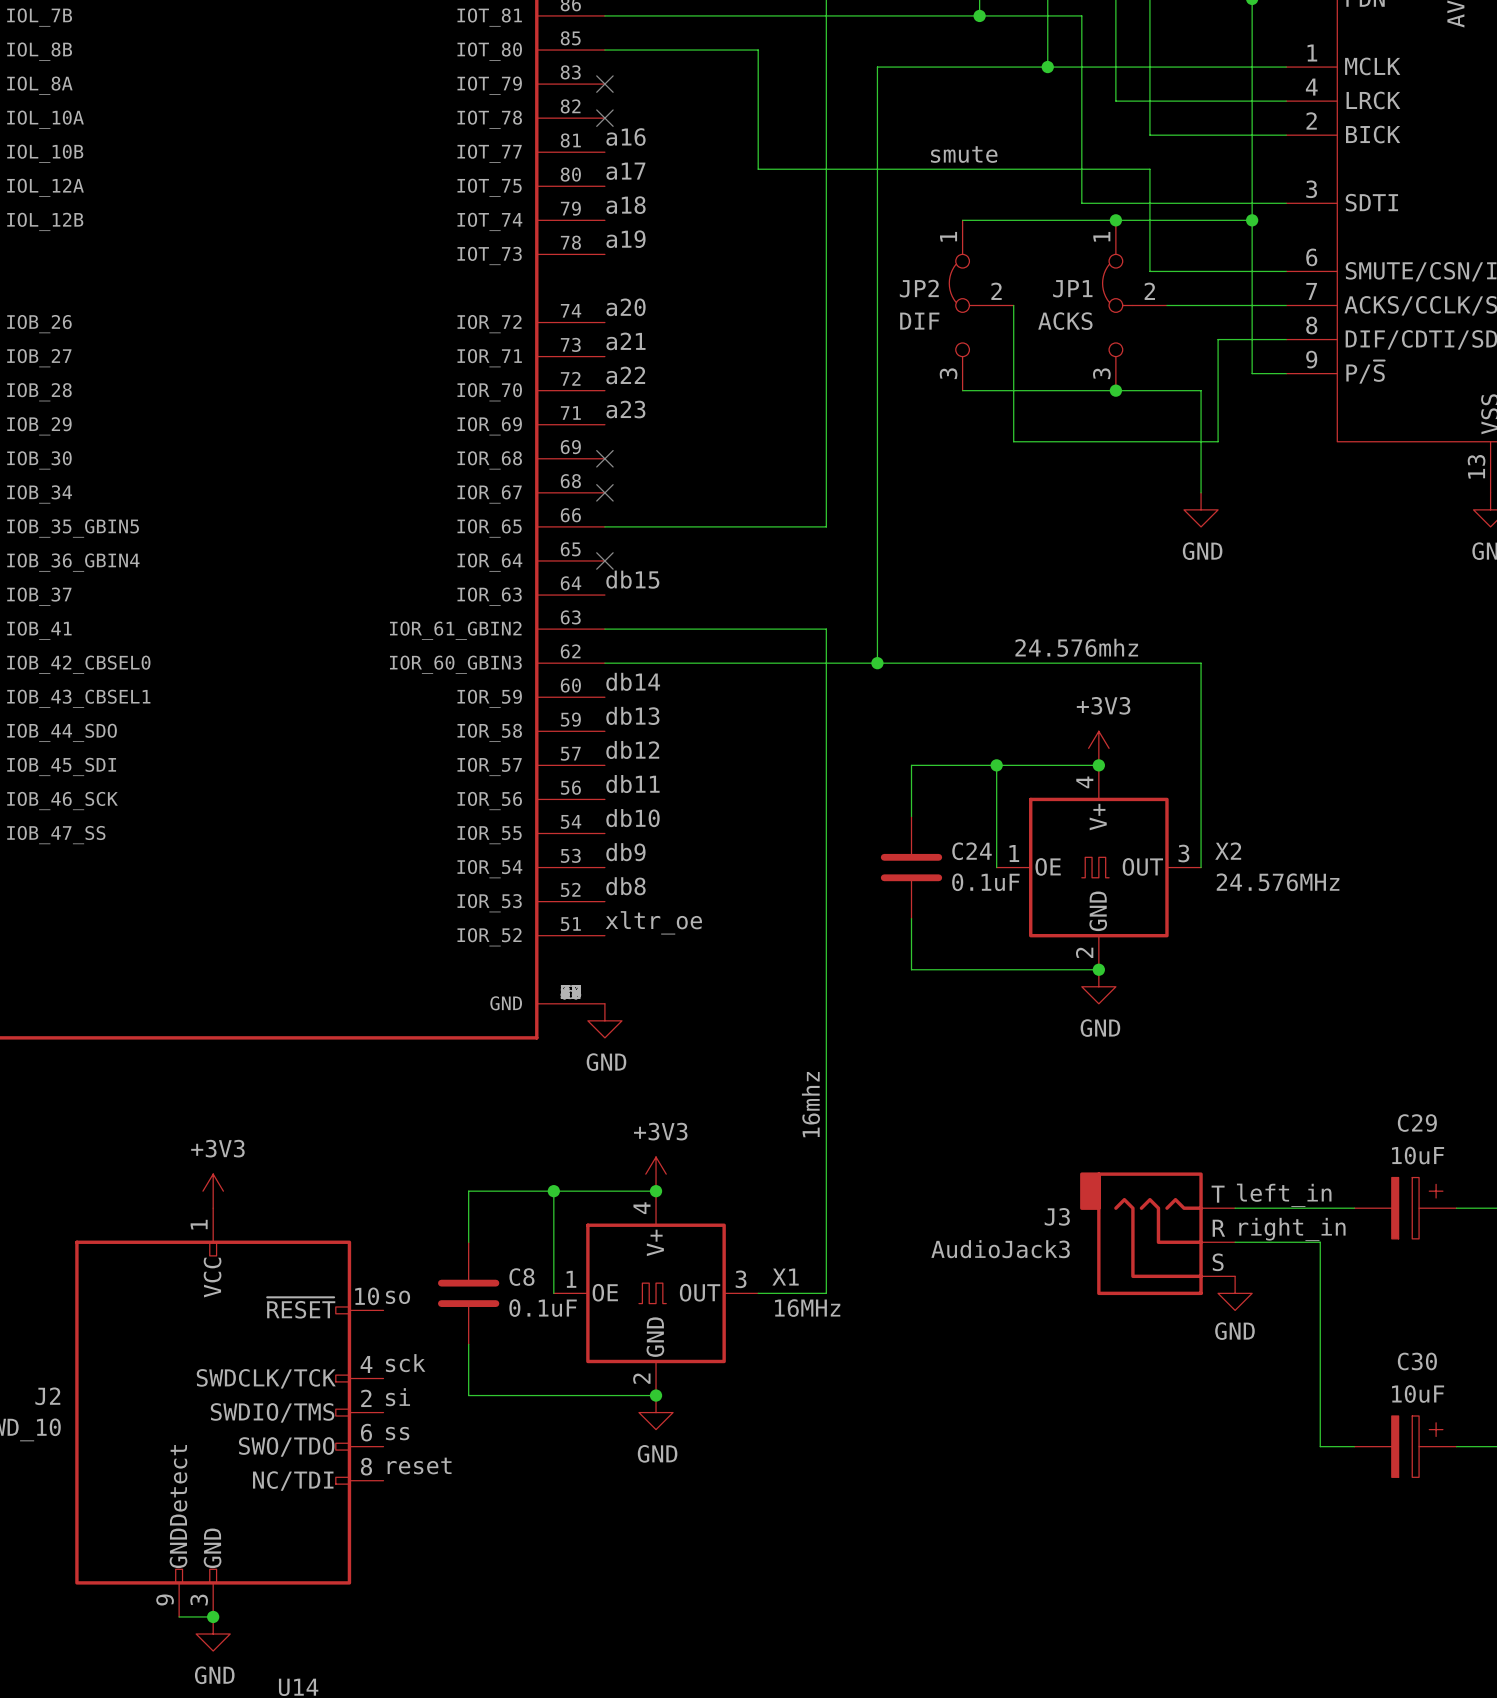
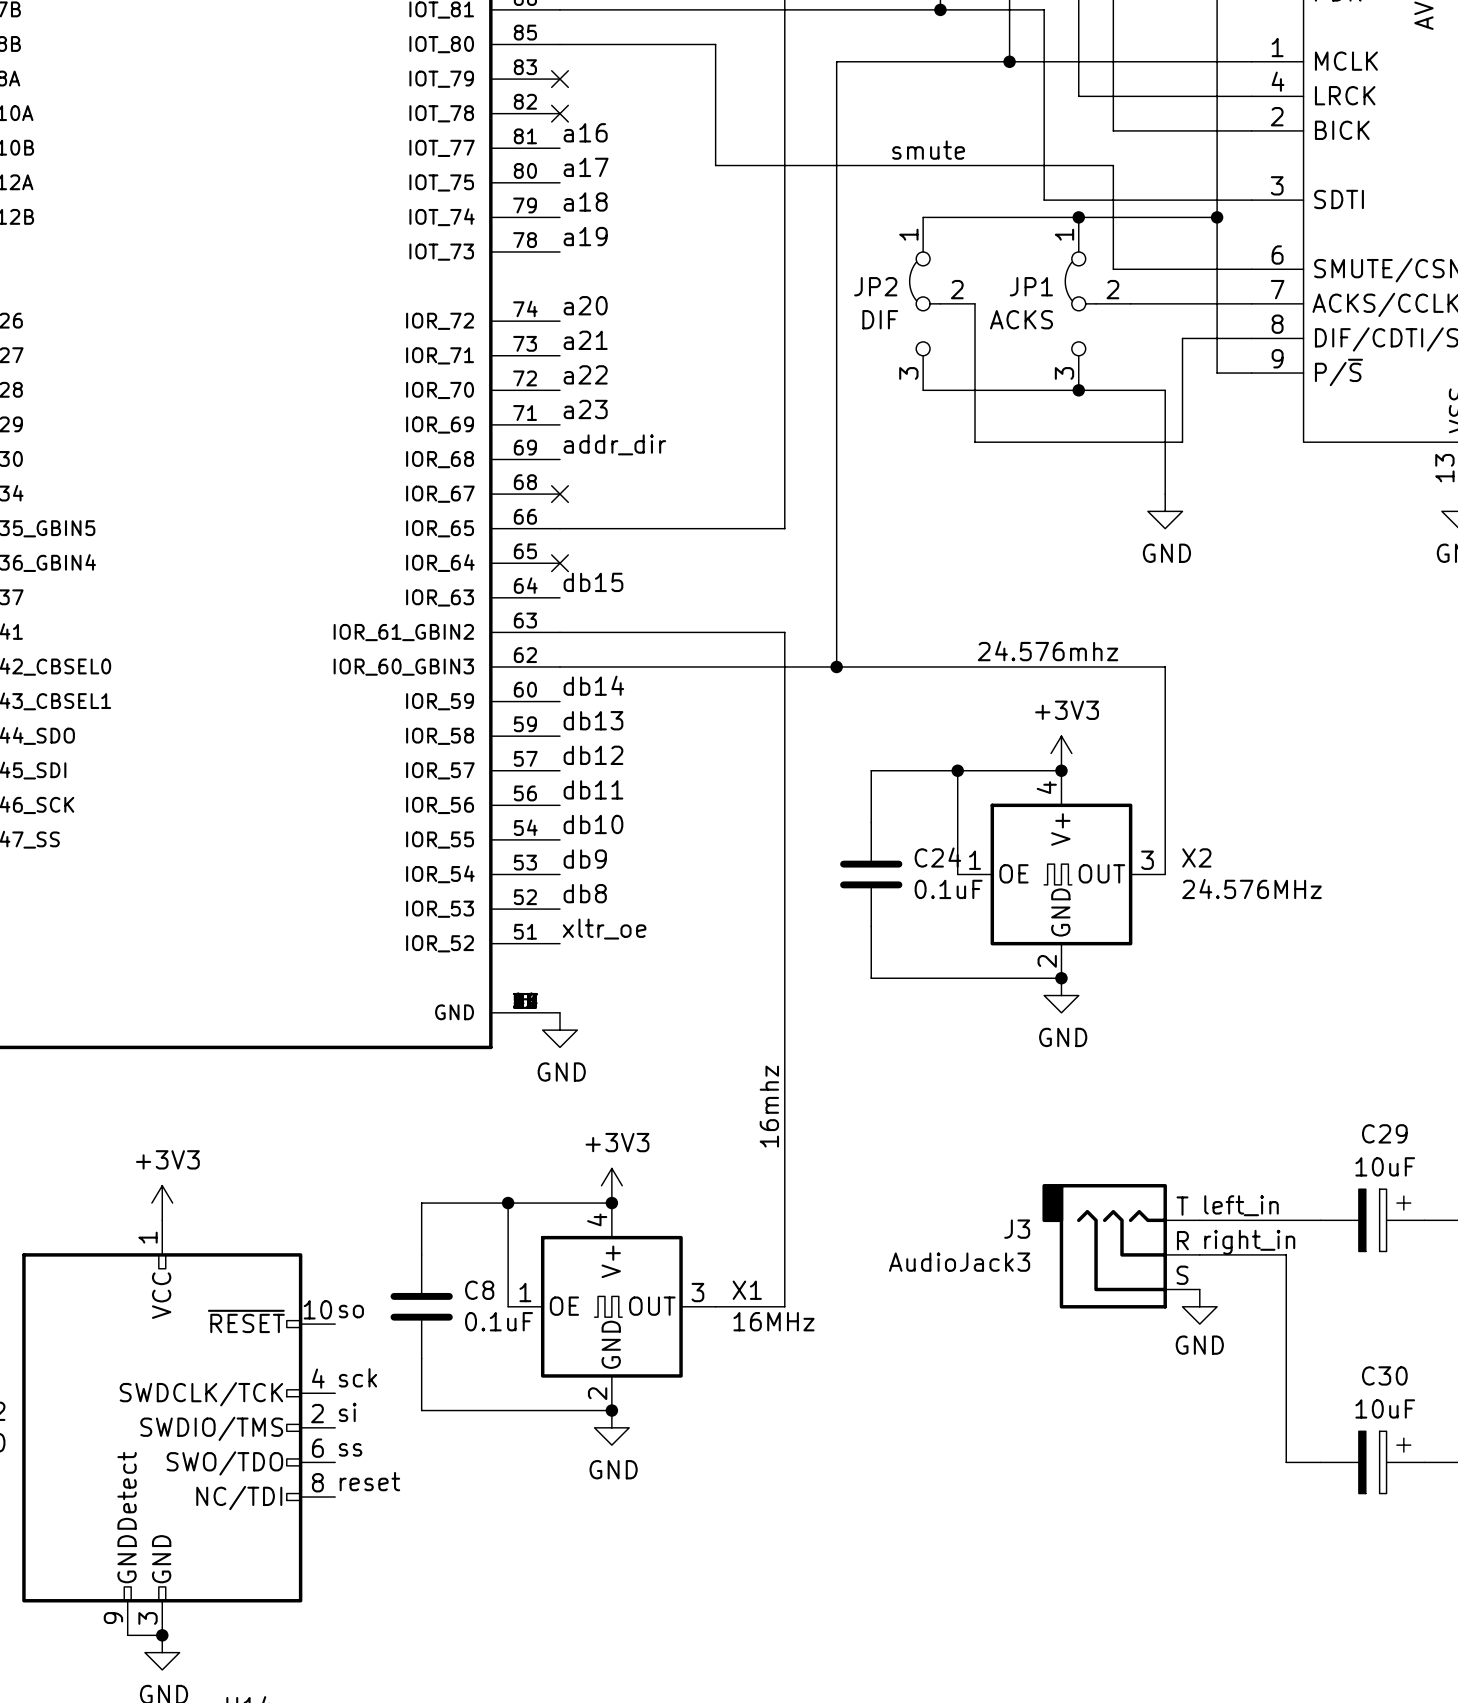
label: none -> addr_dir (614, 444)
no-connect mark: (604, 458) -> none

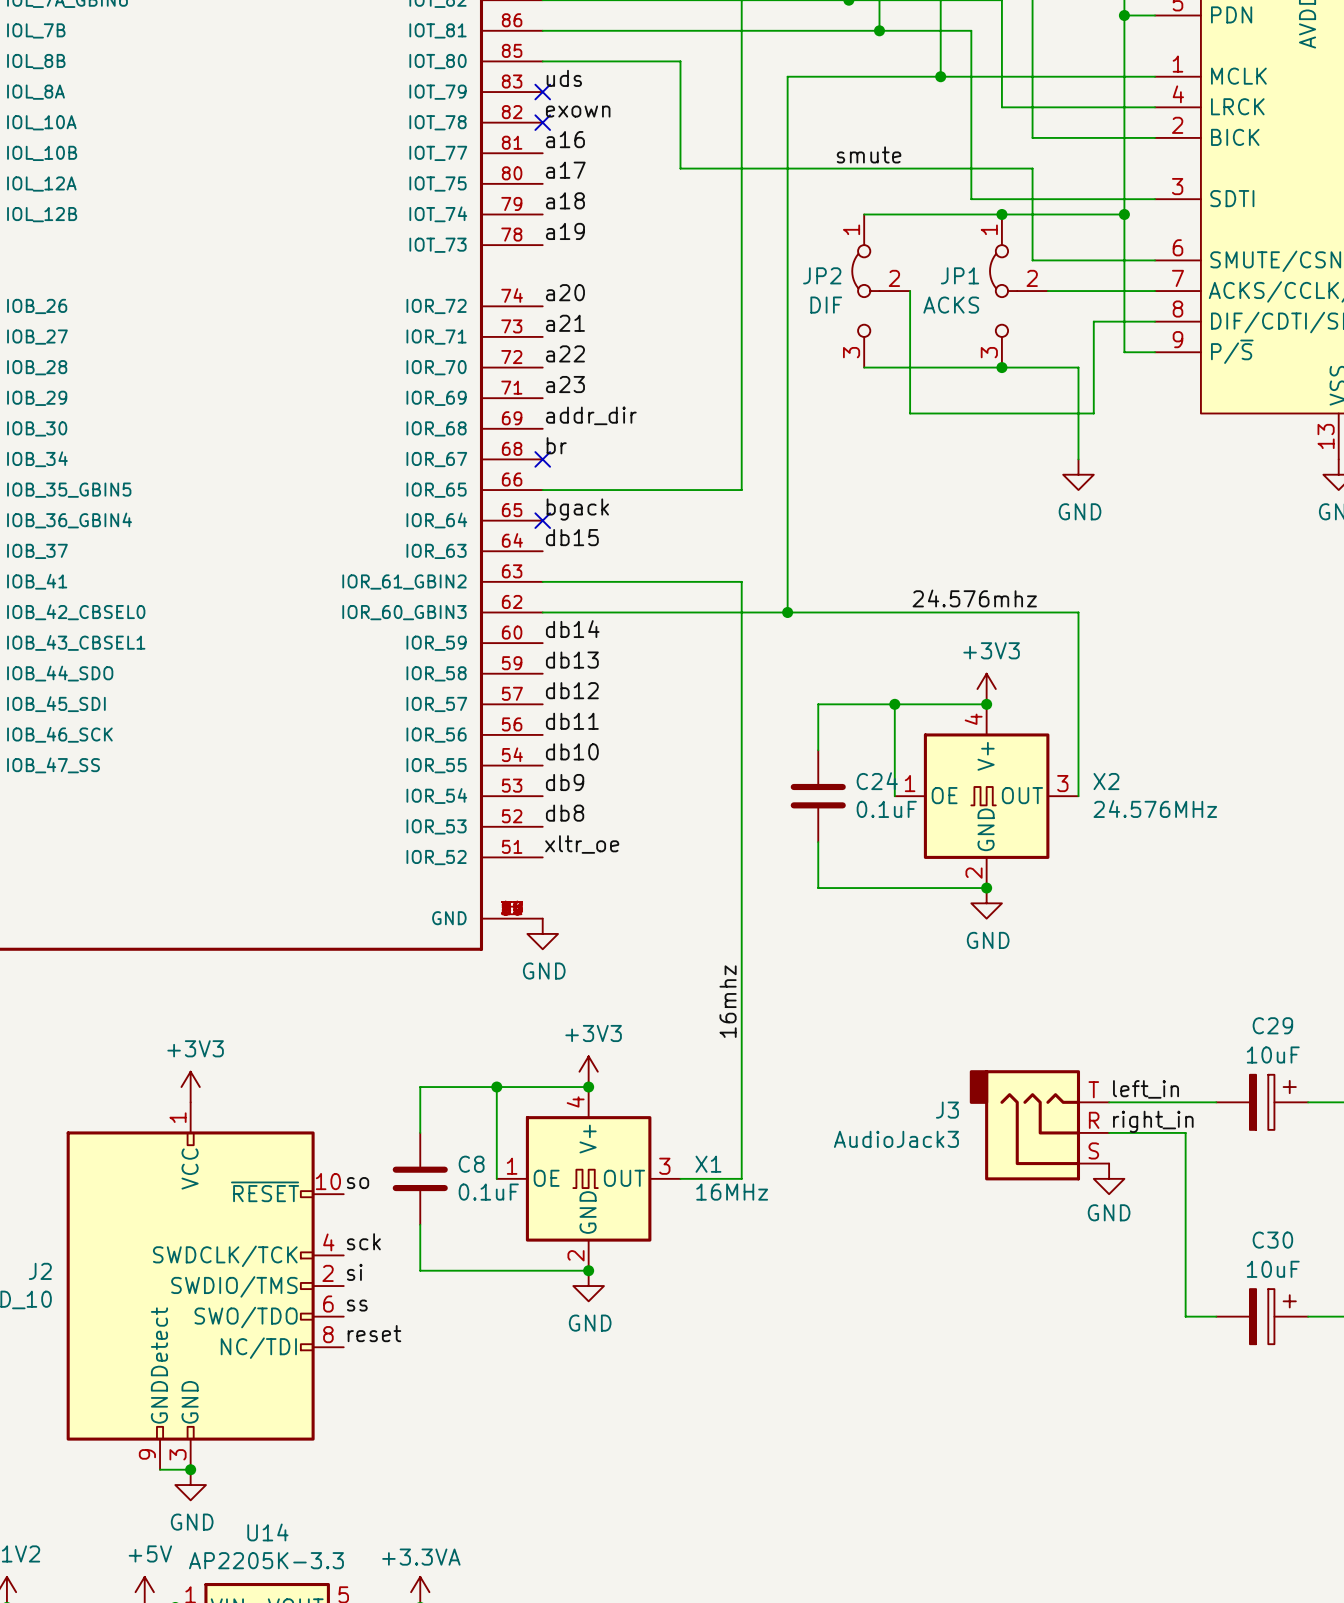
label: none -> uds (564, 78)
label: none -> exown (578, 111)
label: none -> br (556, 445)
label: none -> bgack (577, 509)

